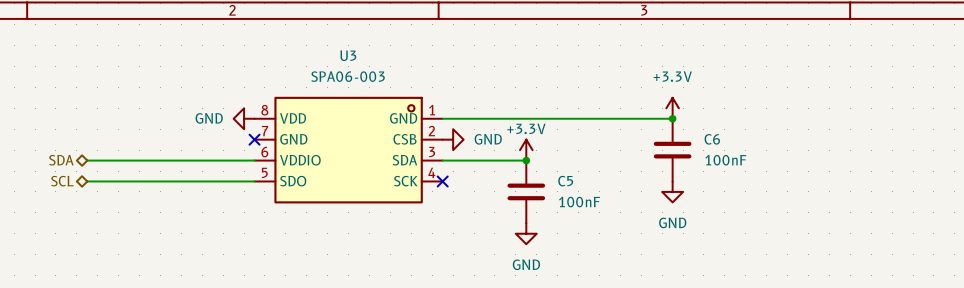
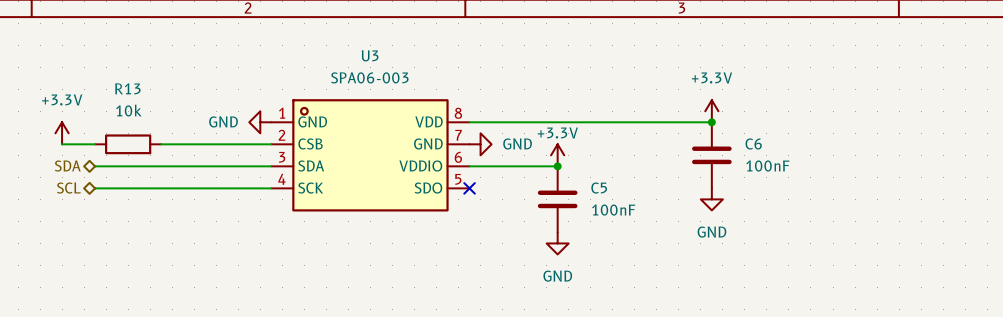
power symbol: none -> +3.3V (62, 133)
wire: none -> (62, 144) (95, 144)
R13: none -> 10k (128, 144)
wire: none -> (161, 144) (271, 144)
no-connect mark: (254, 139) -> none
U3 flip: as is (348, 150) -> left-right (370, 155)

